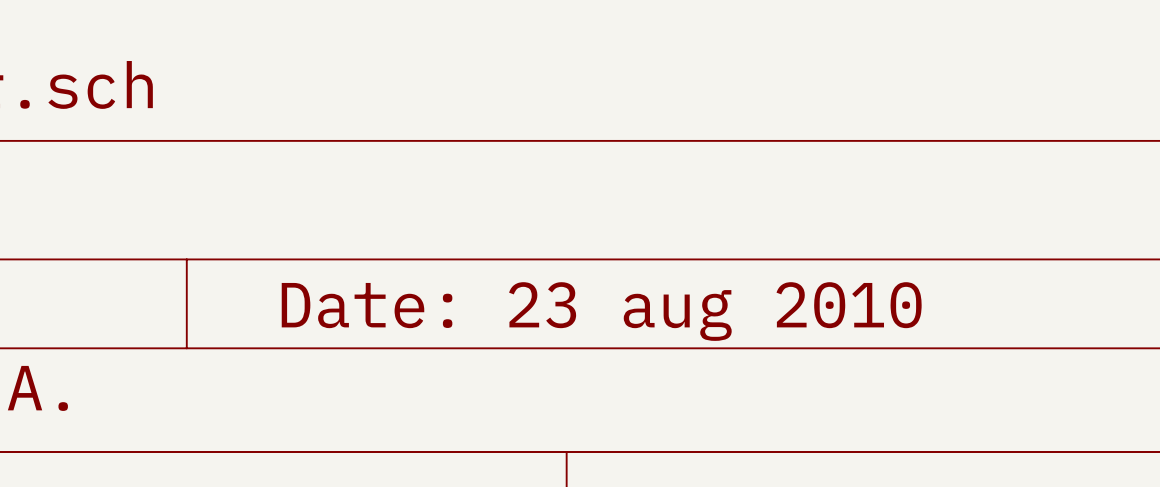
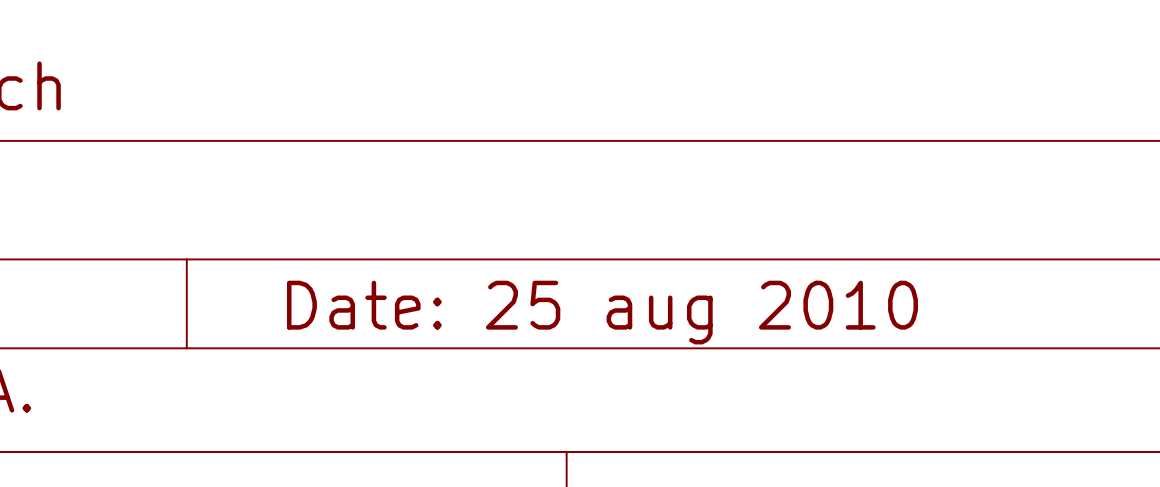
title block: Date: 23 aug 2010 (601, 311) -> Date: 25 aug 2010 (602, 312)

